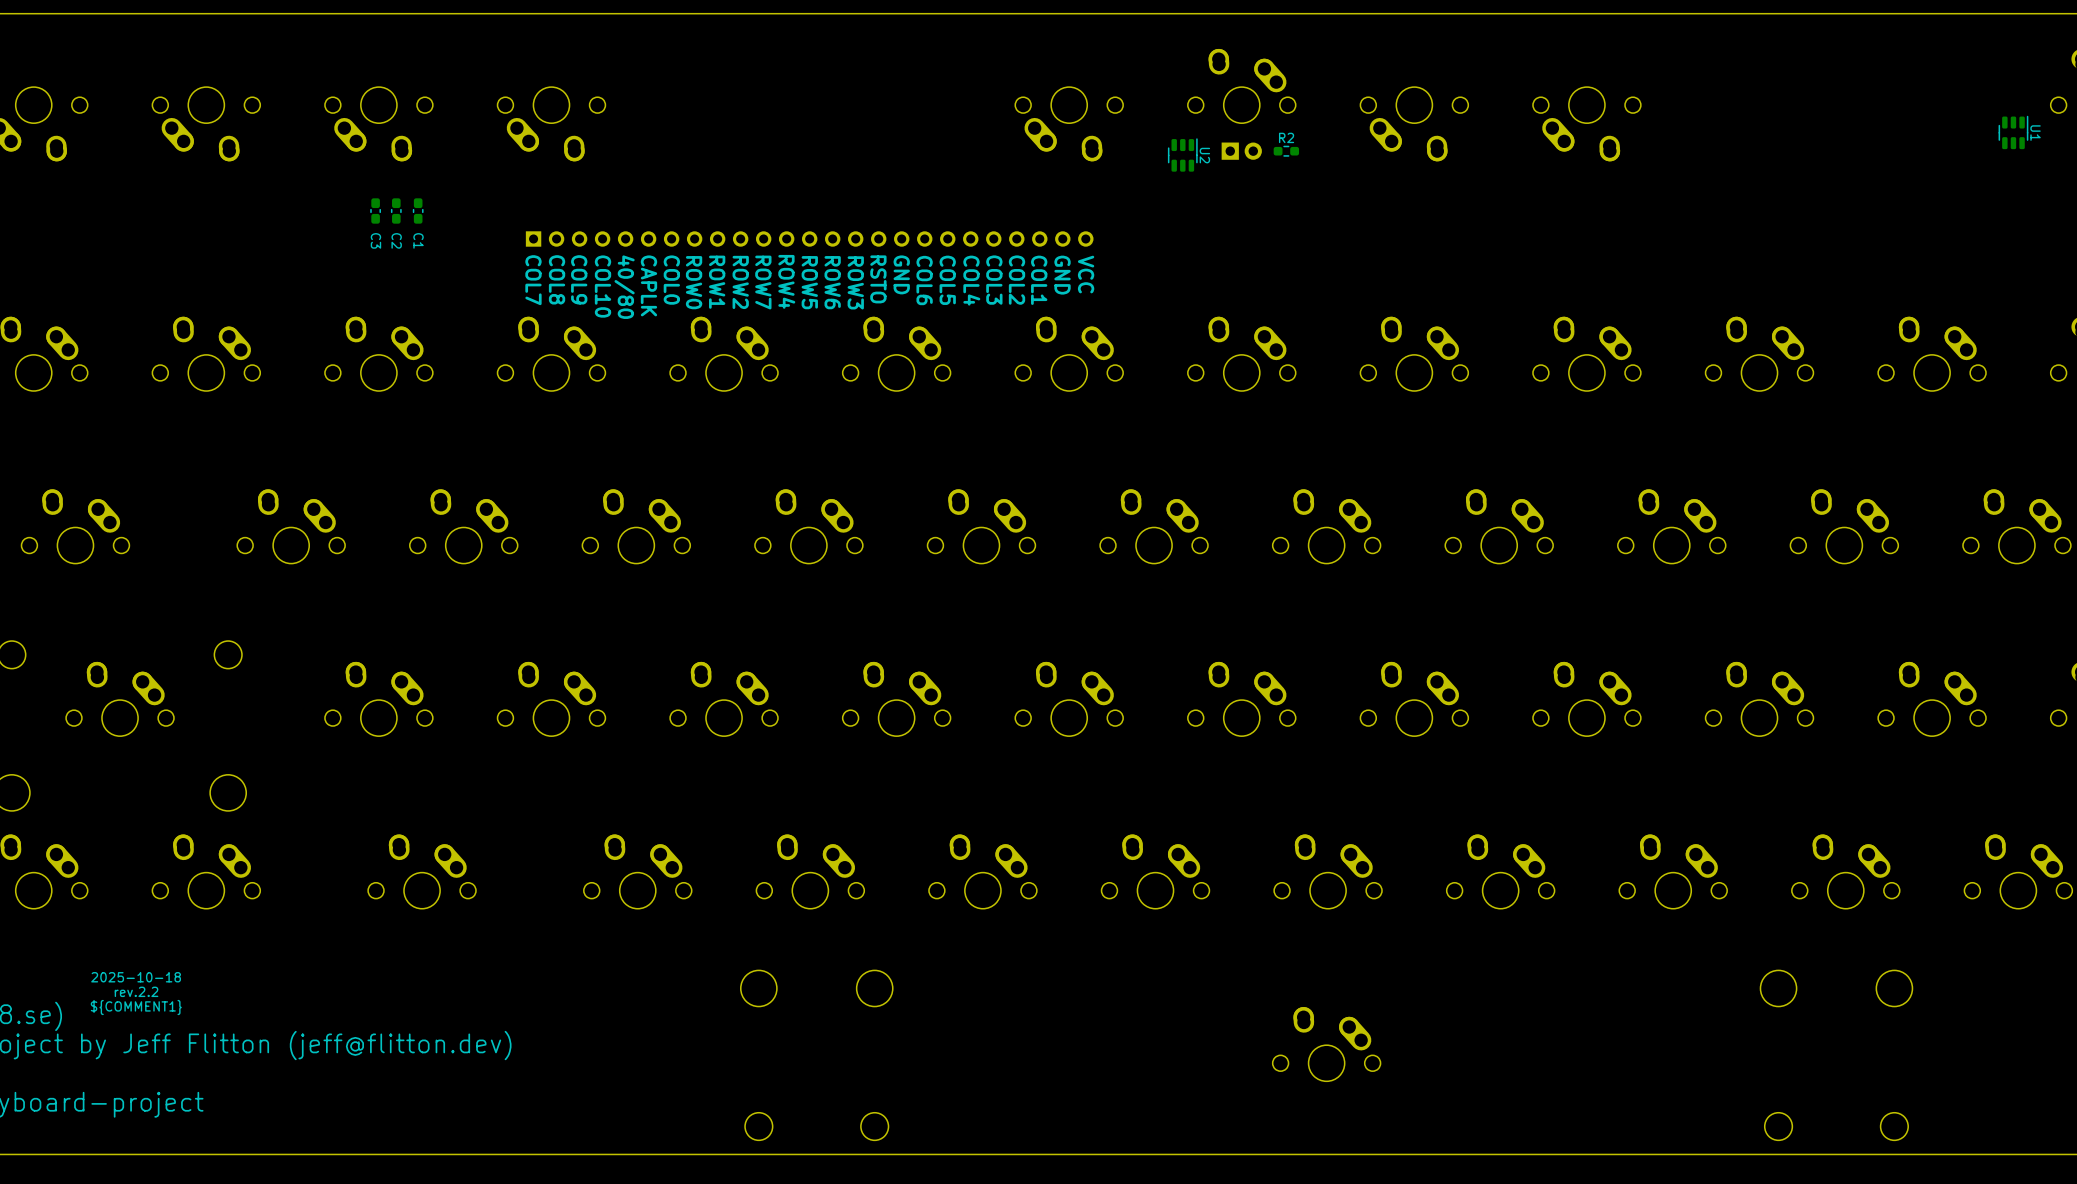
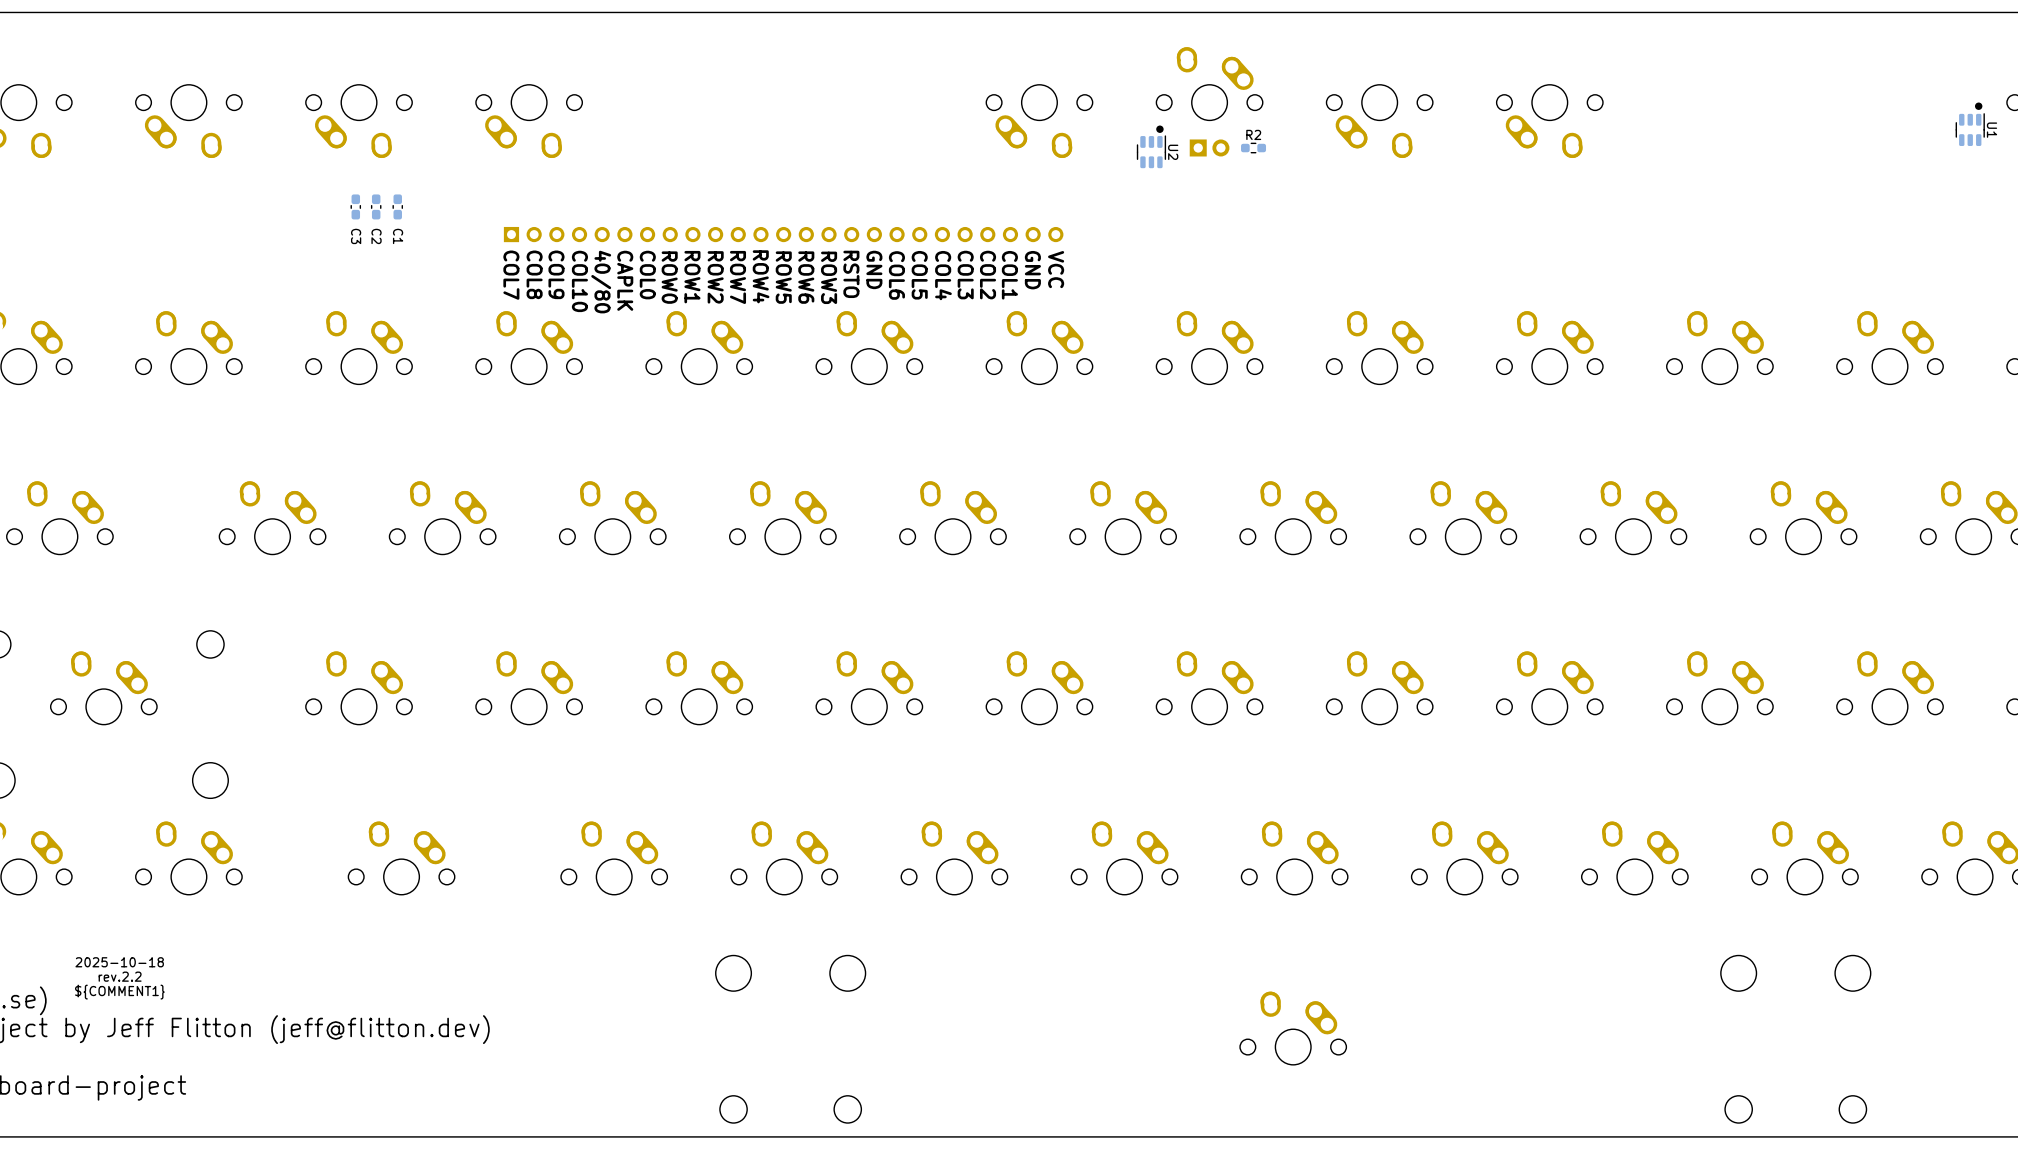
drawing: none -> [1974, 102, 1983, 110]
drawing: none -> [1156, 125, 1164, 133]

